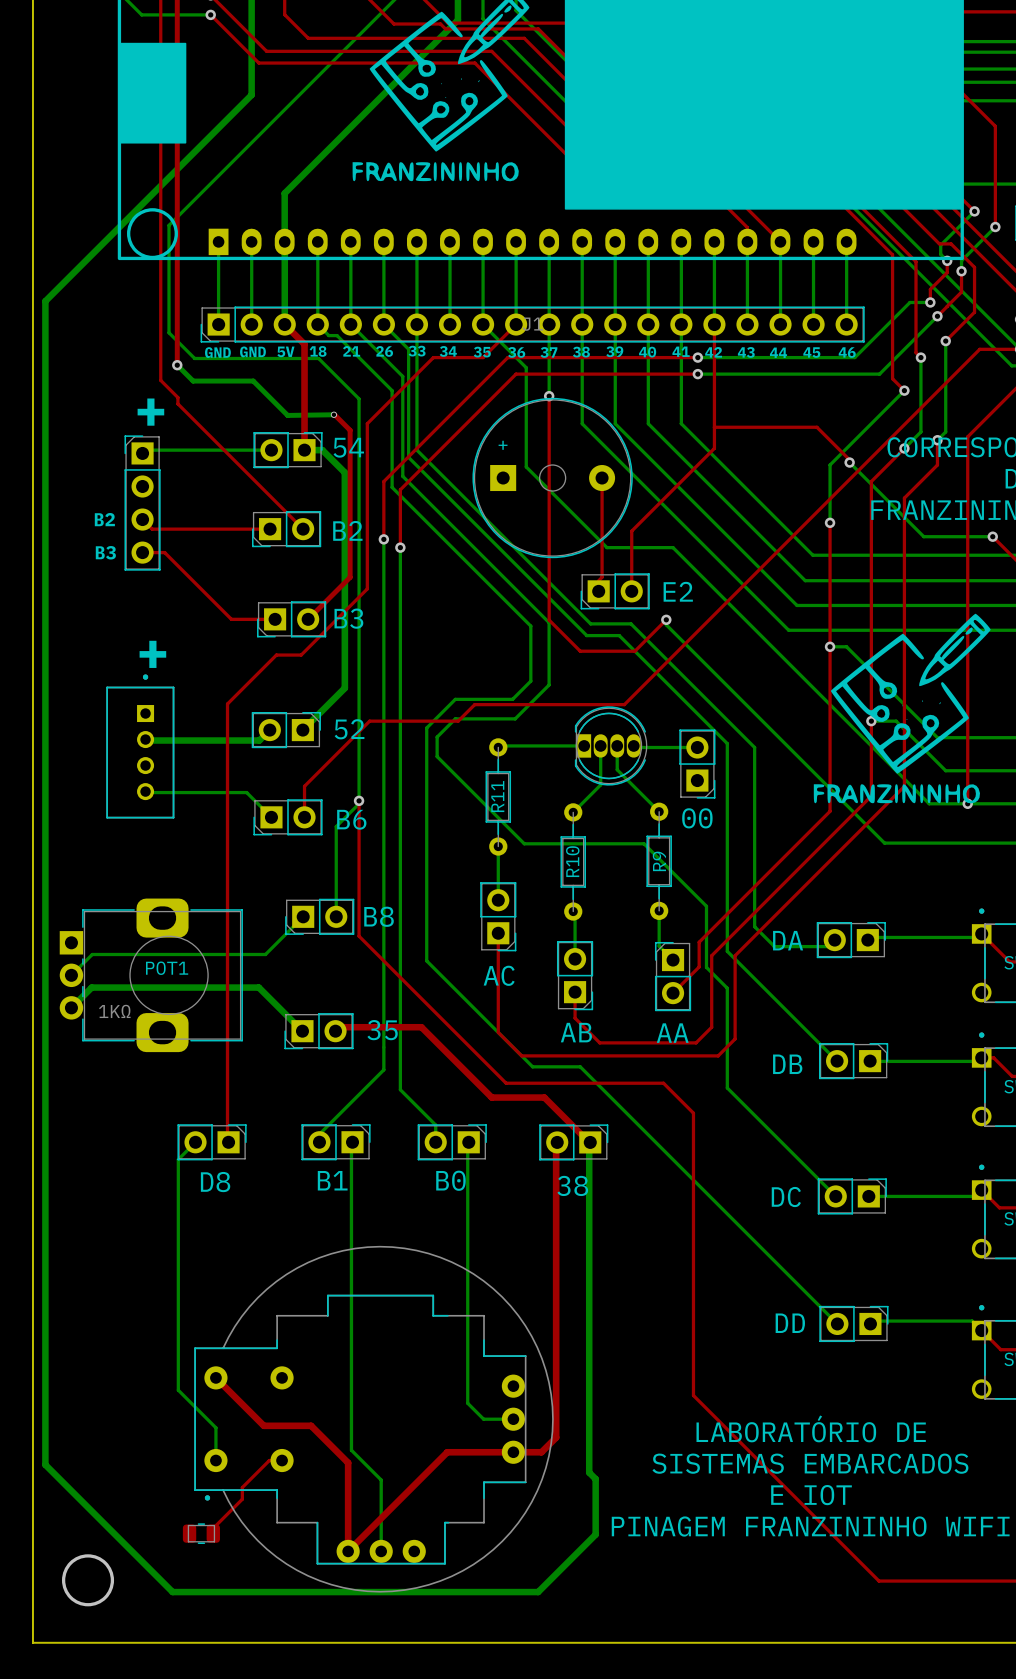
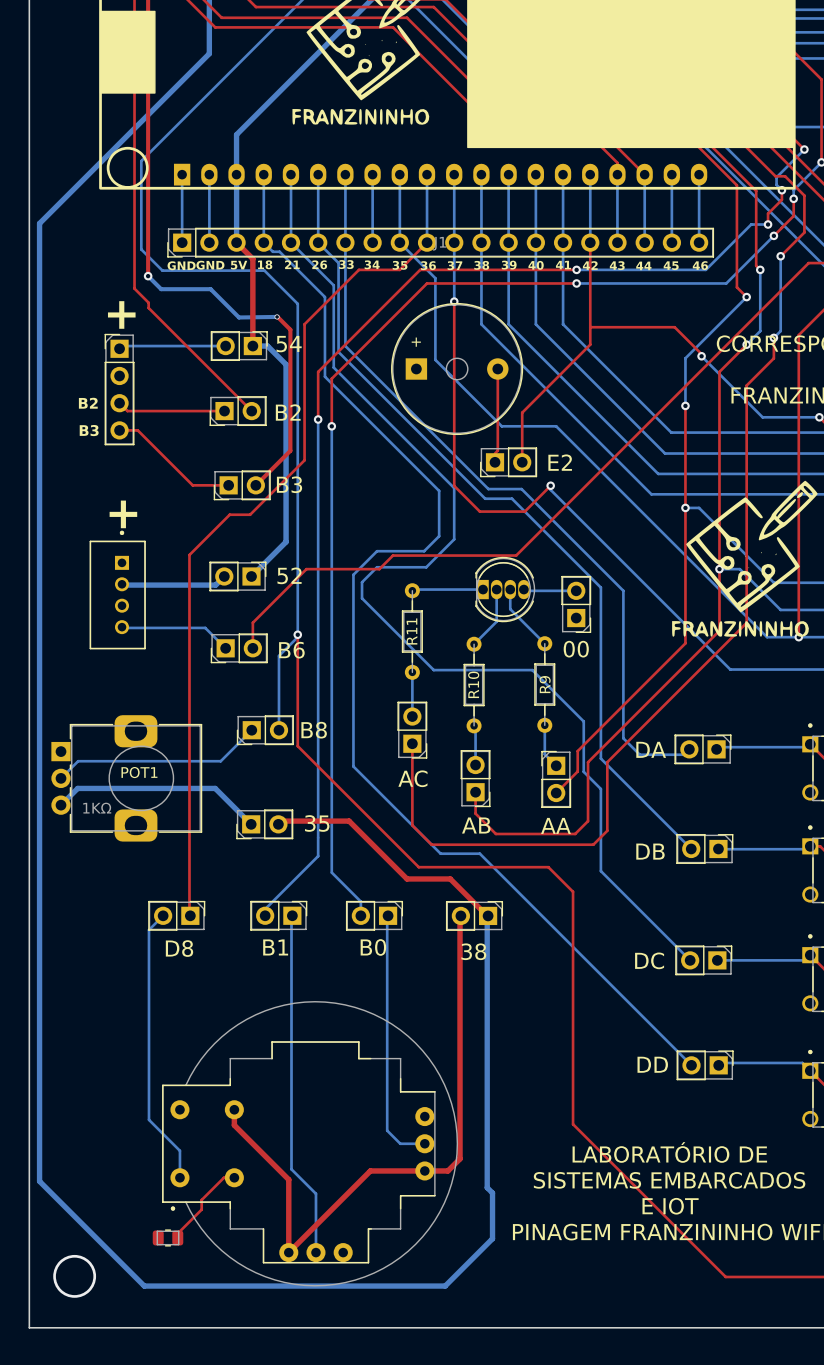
top track: (215, 1377) (263, 1425) (311, 1425) -> (234, 1109) (234, 1125) (258, 1149)

